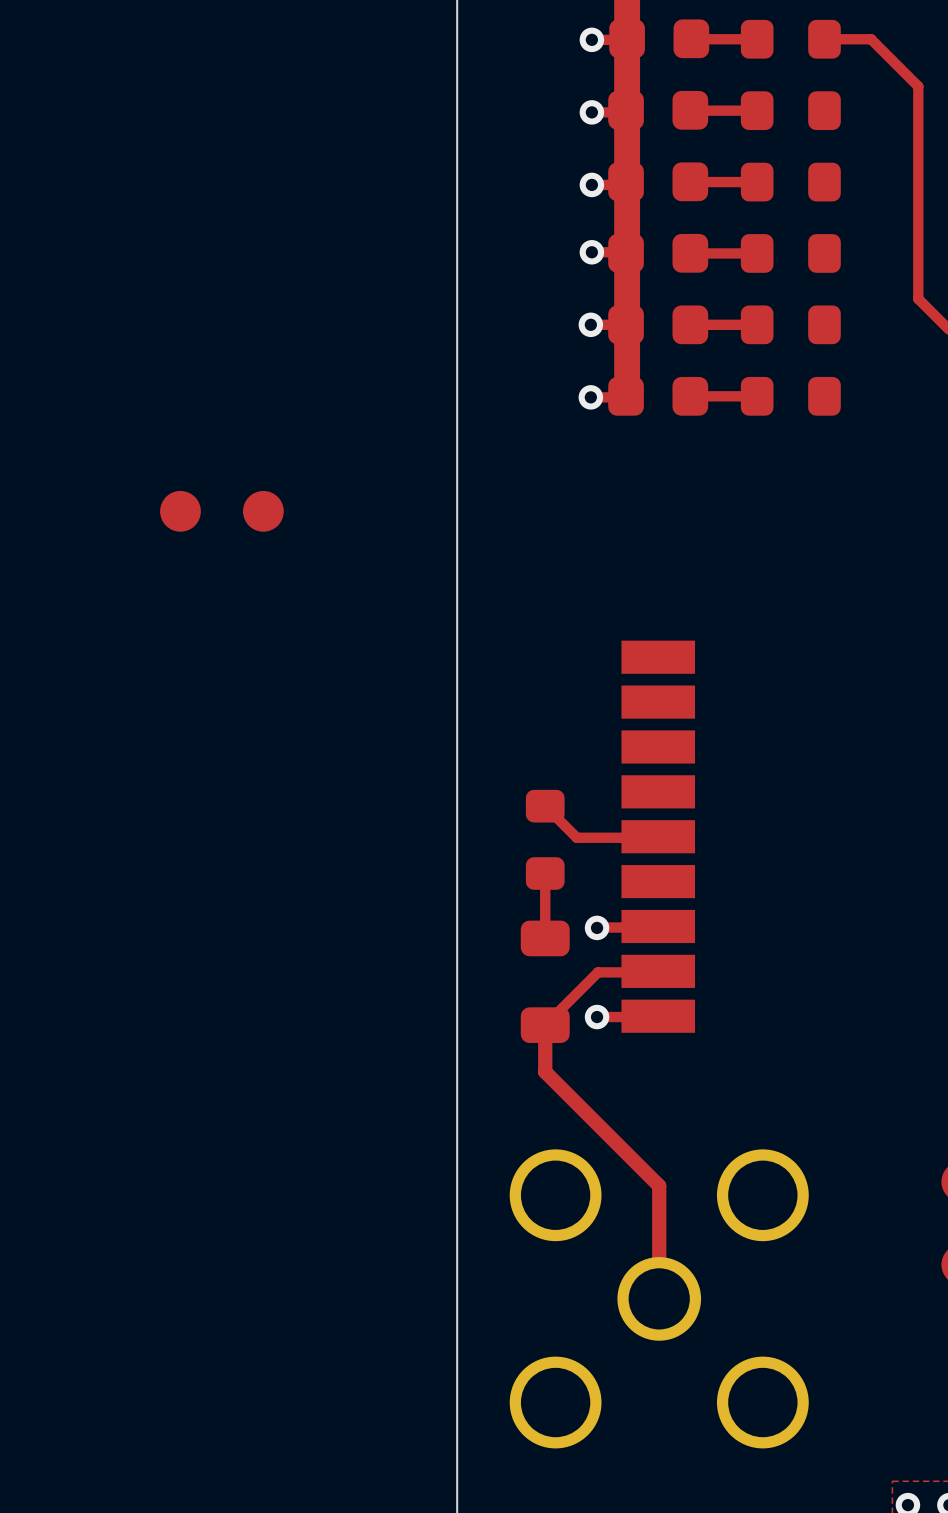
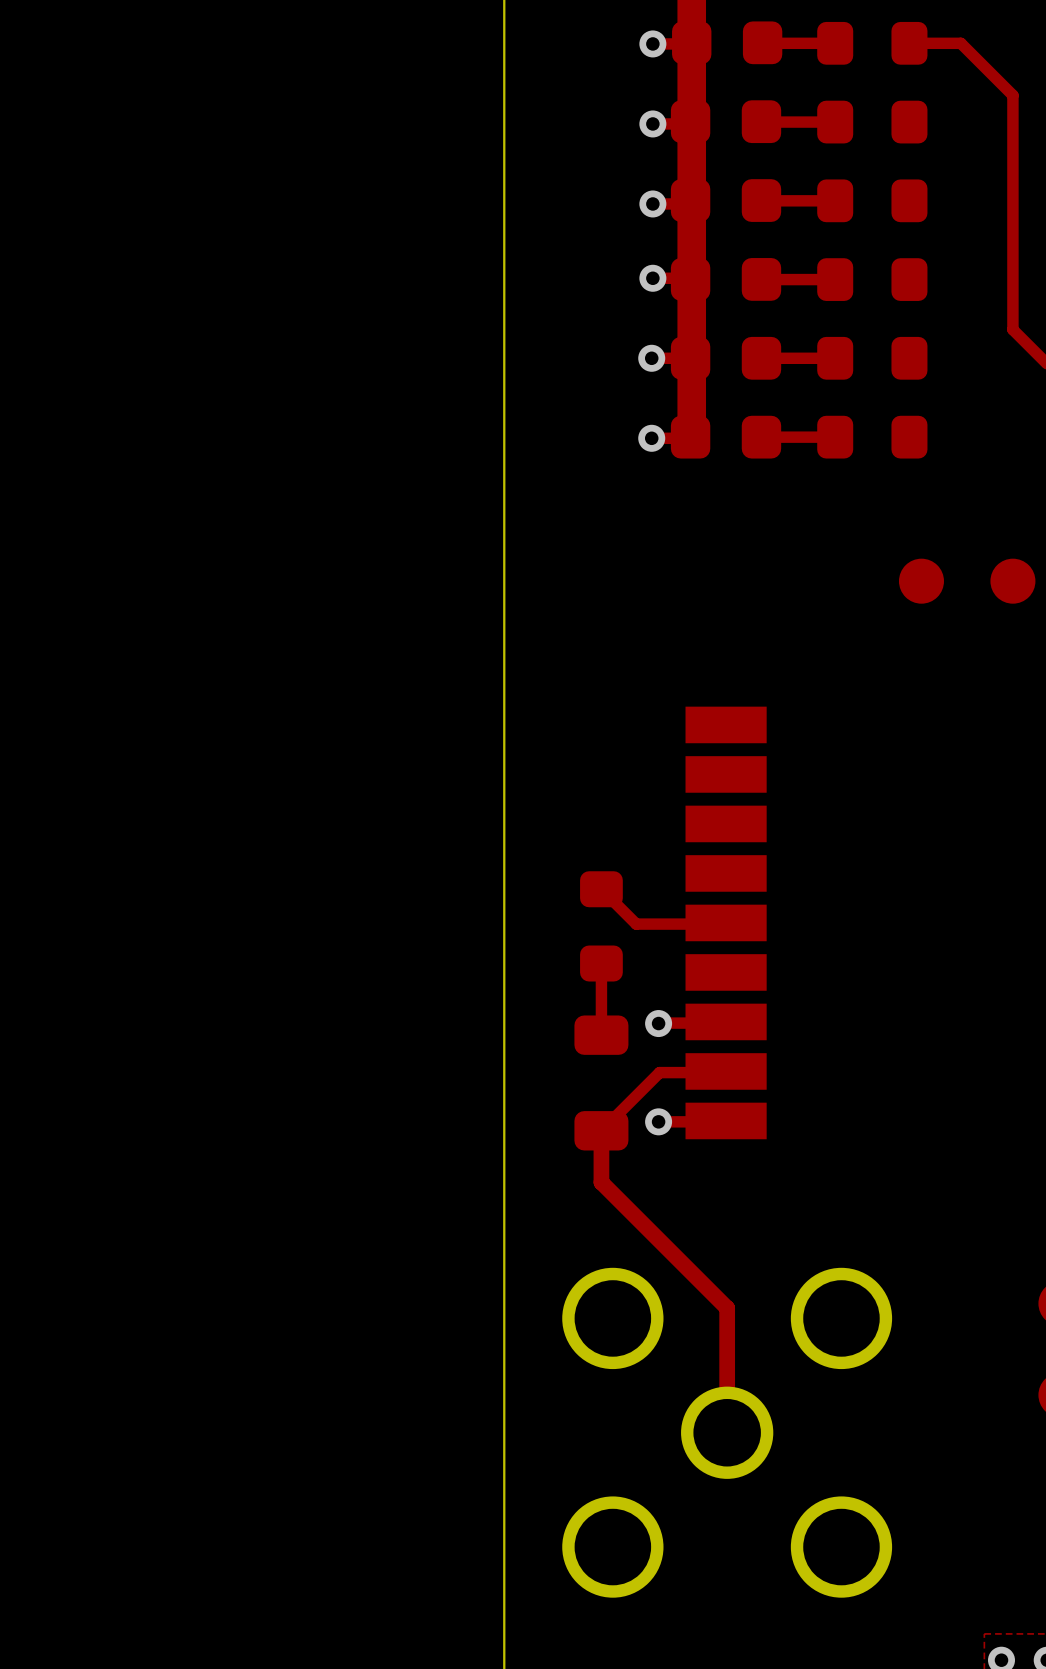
part: (180, 511) -> none
part: (263, 511) -> none
part: none -> (921, 581)
part: none -> (1012, 581)

